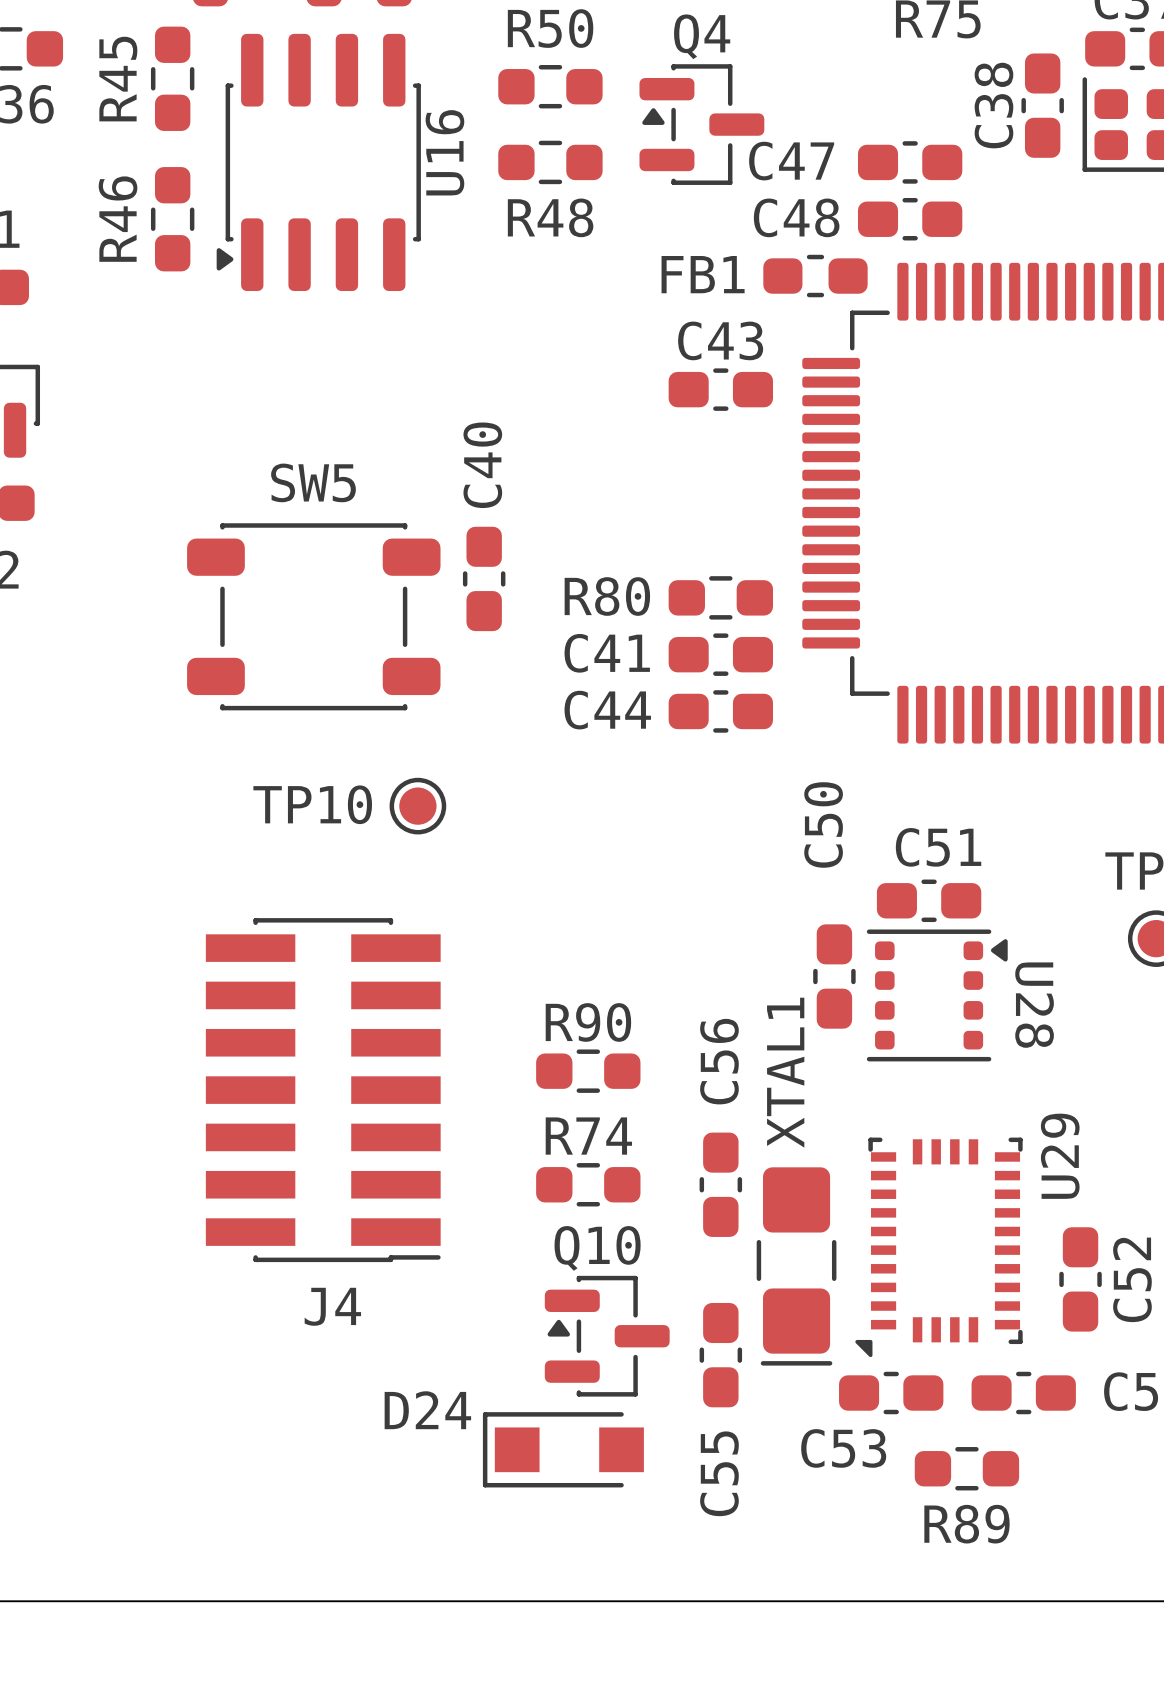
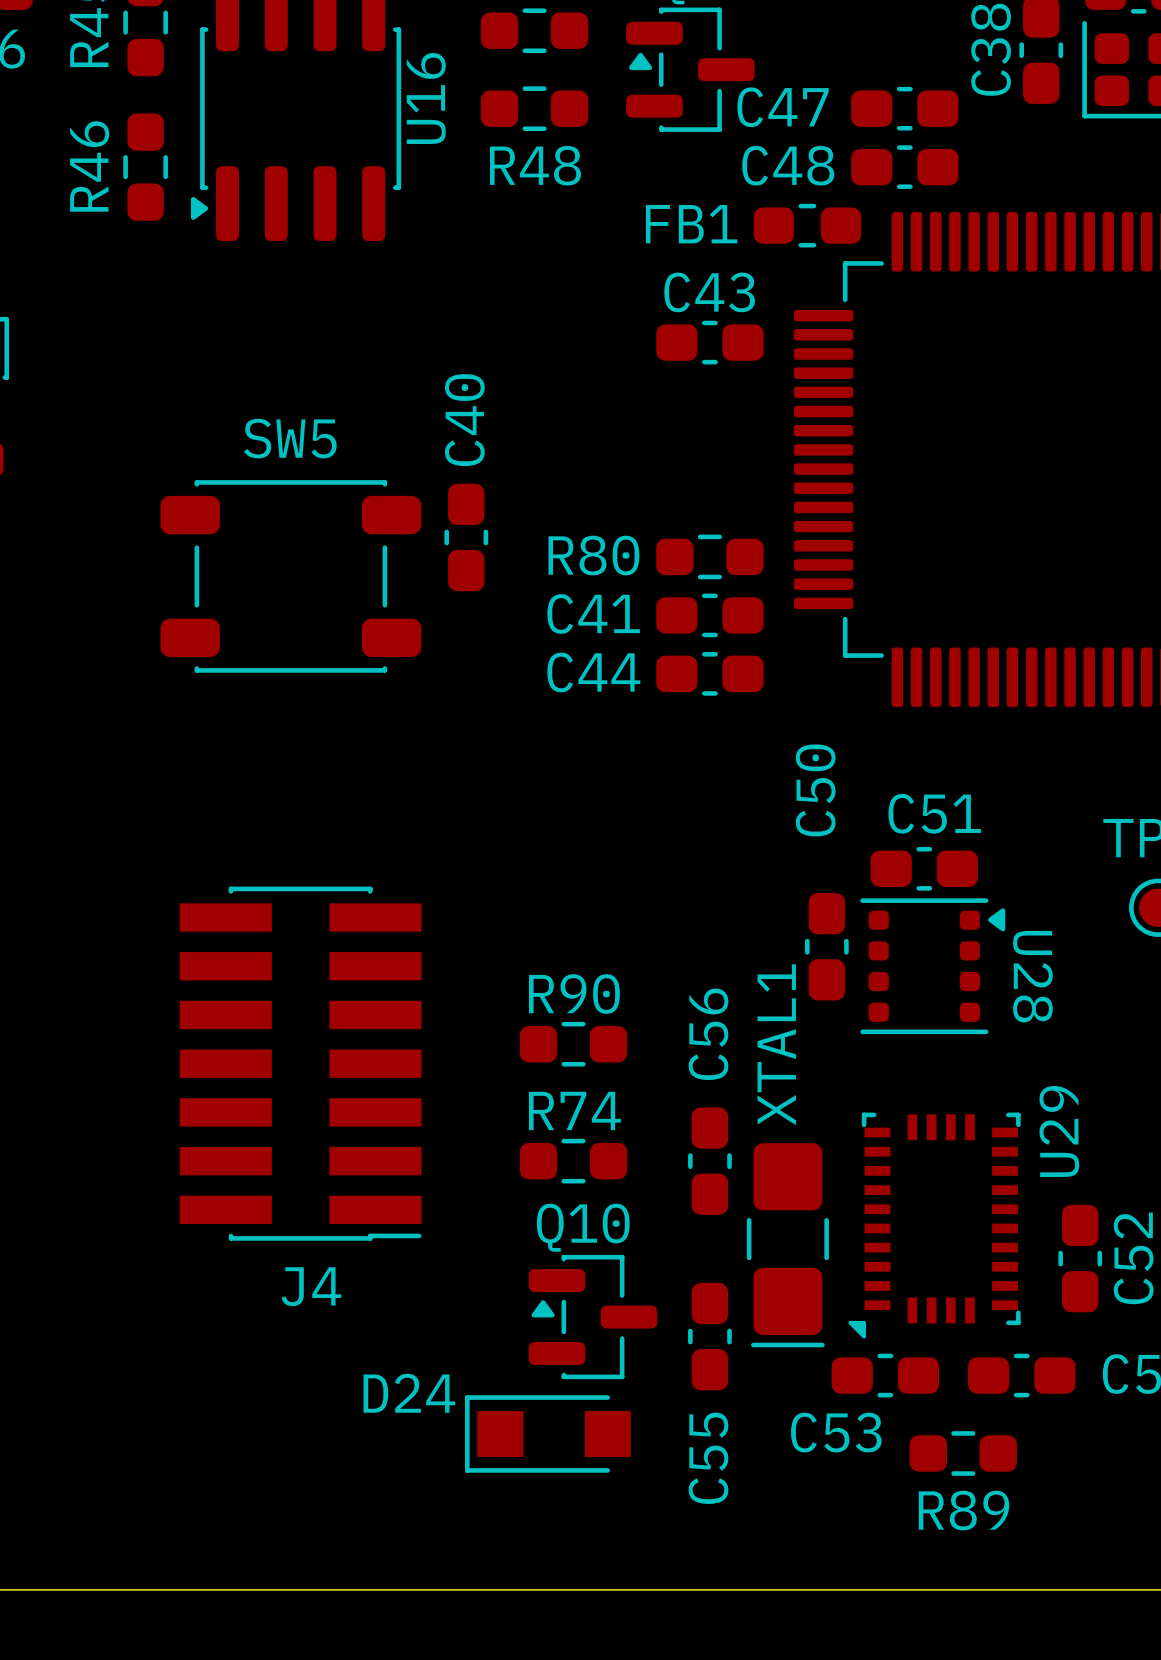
TP10: (417, 806) -> none

